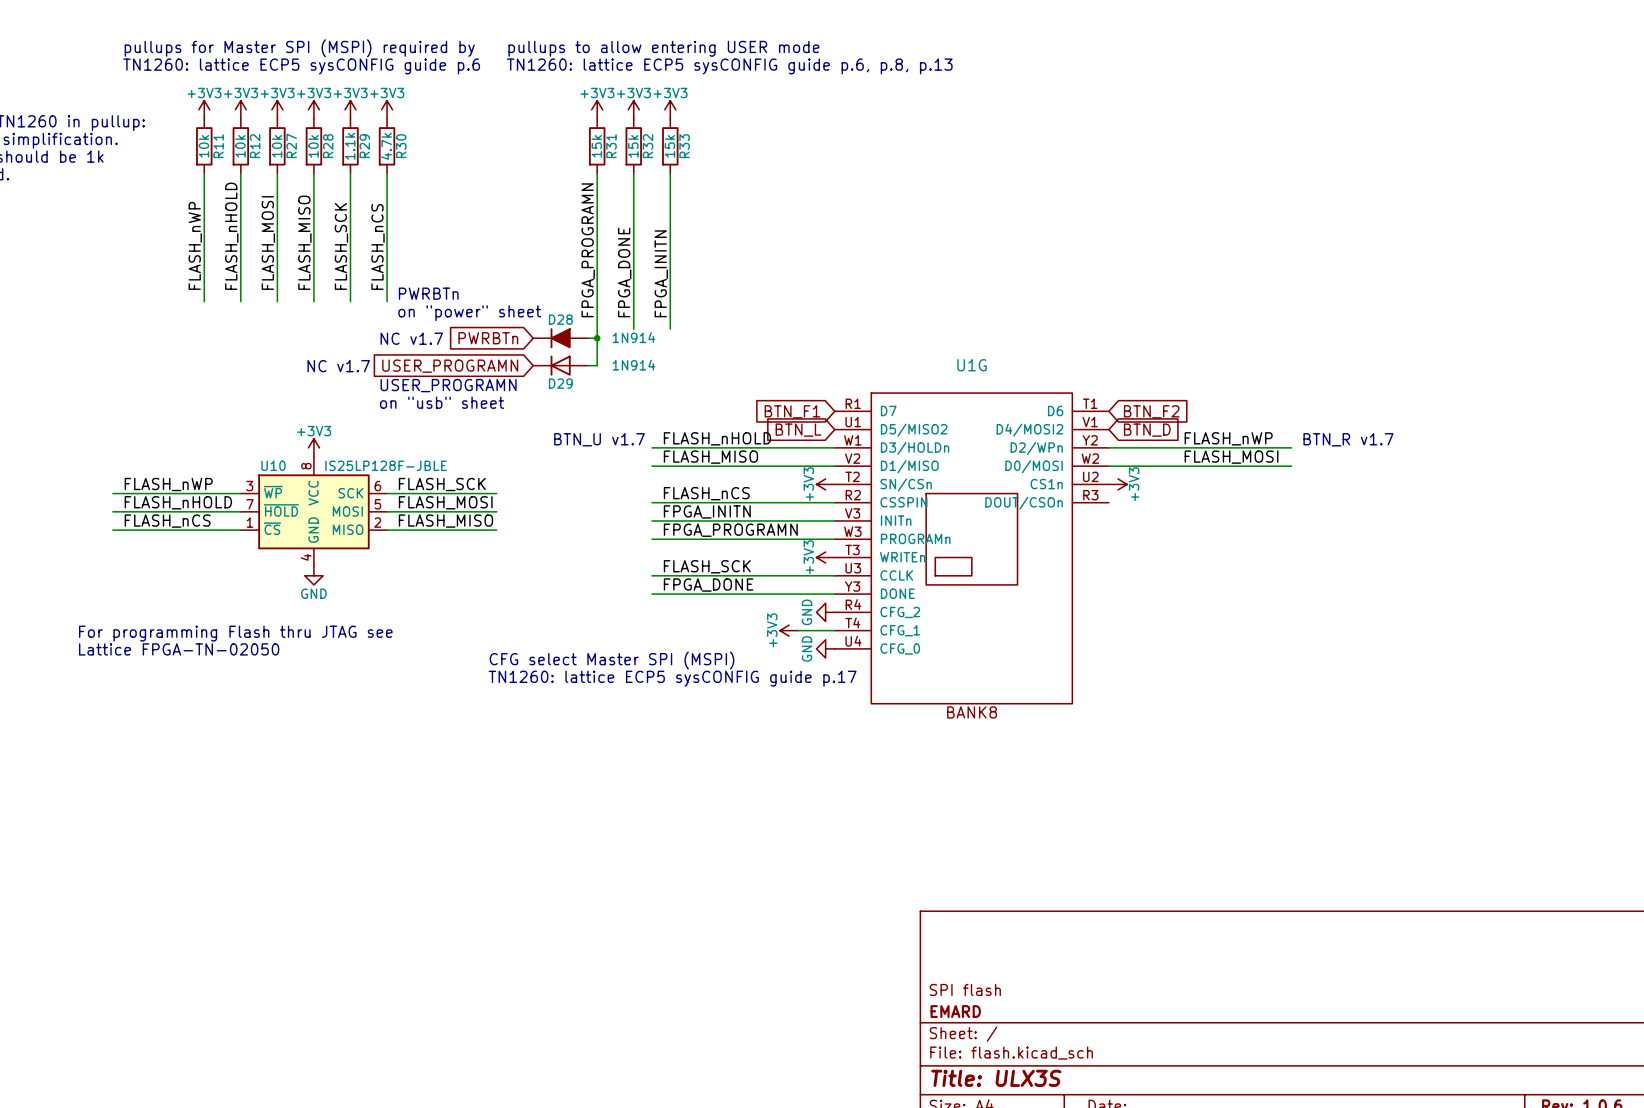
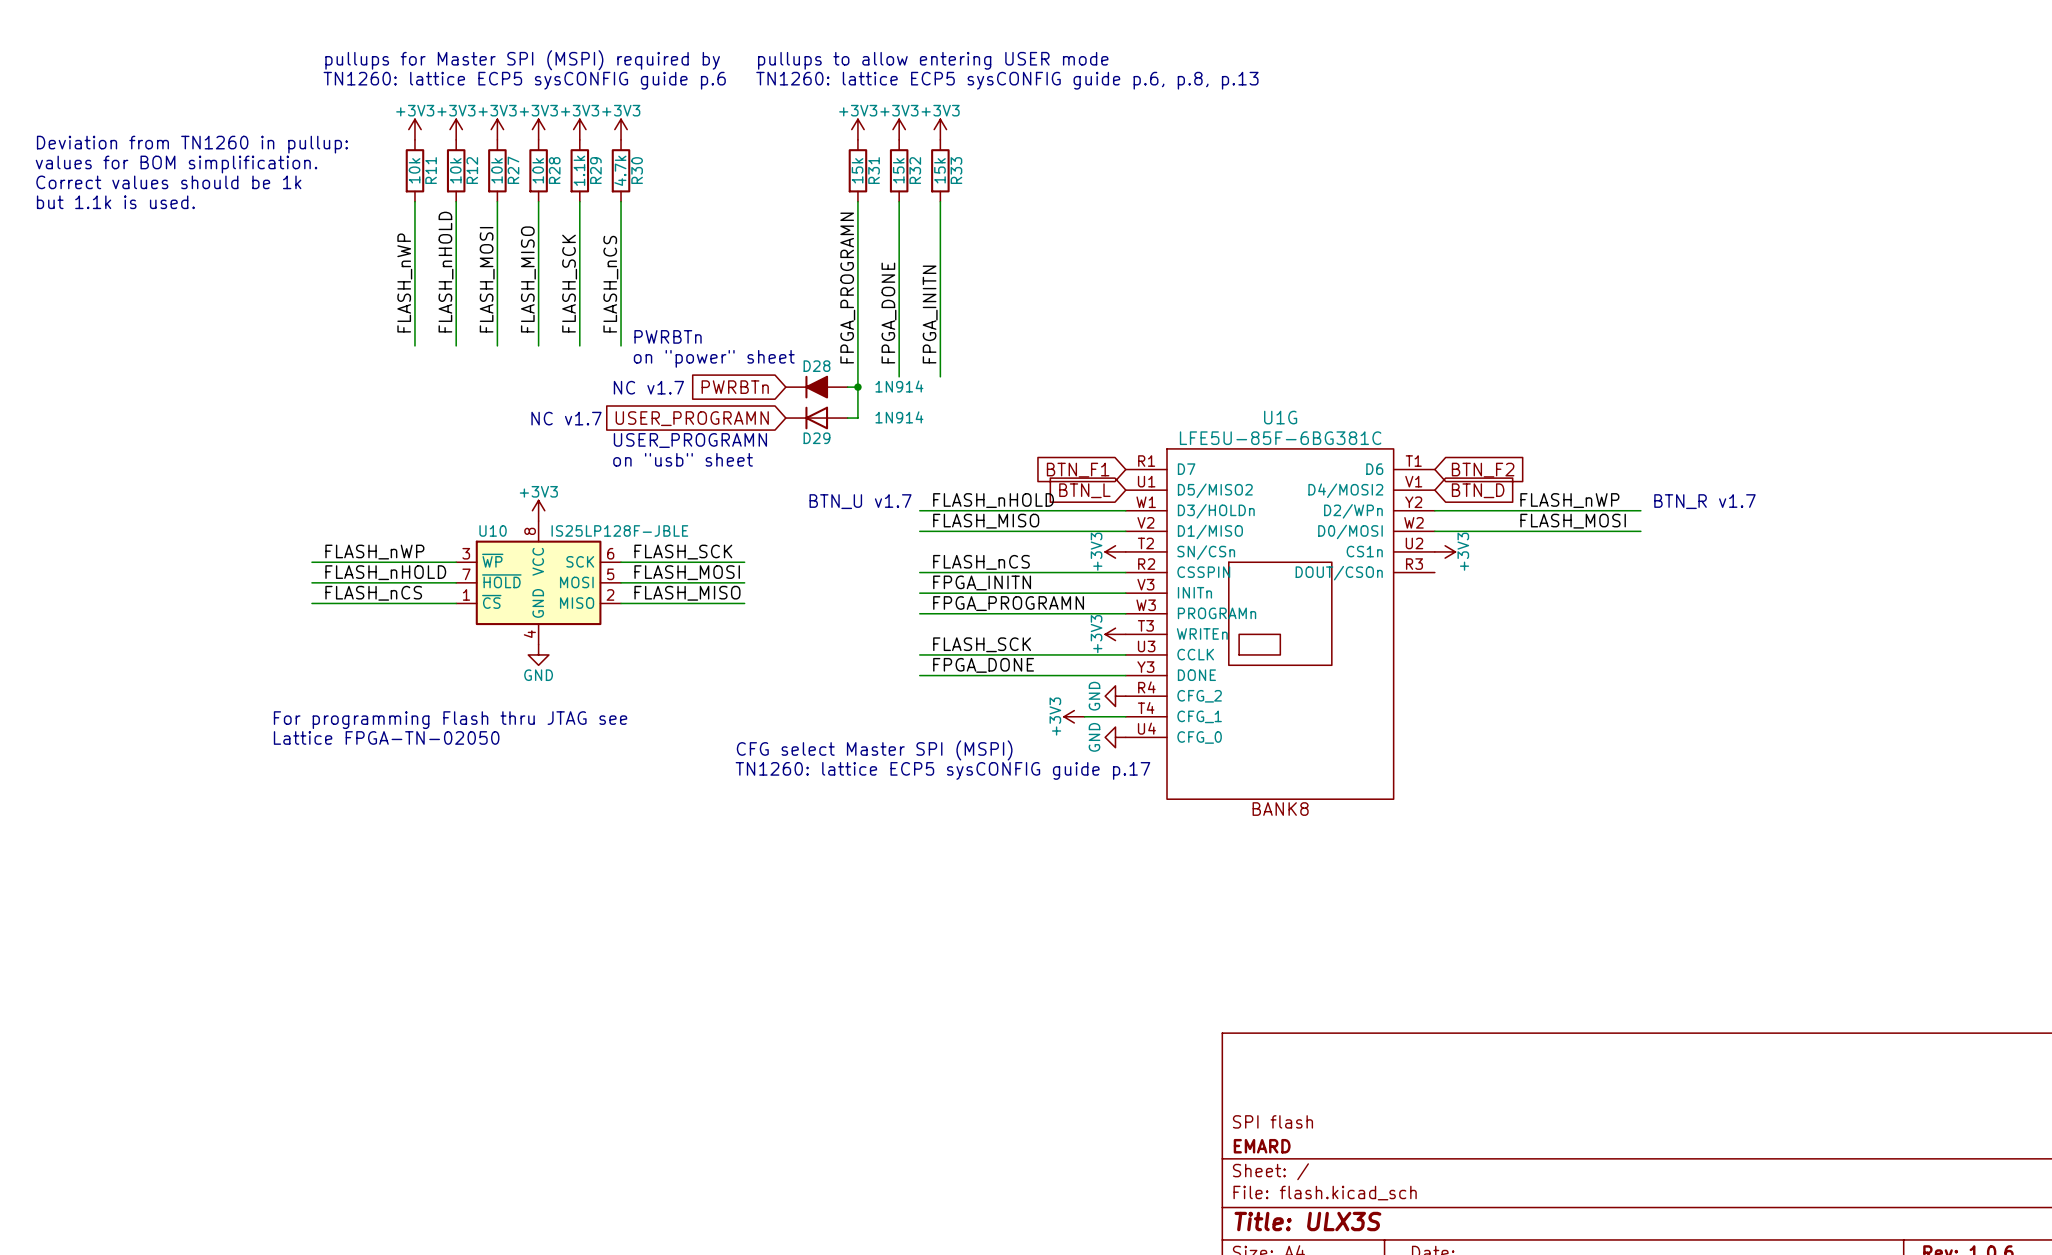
U1G value: none -> LFE5U-85F-6BG381C (1280, 438)

